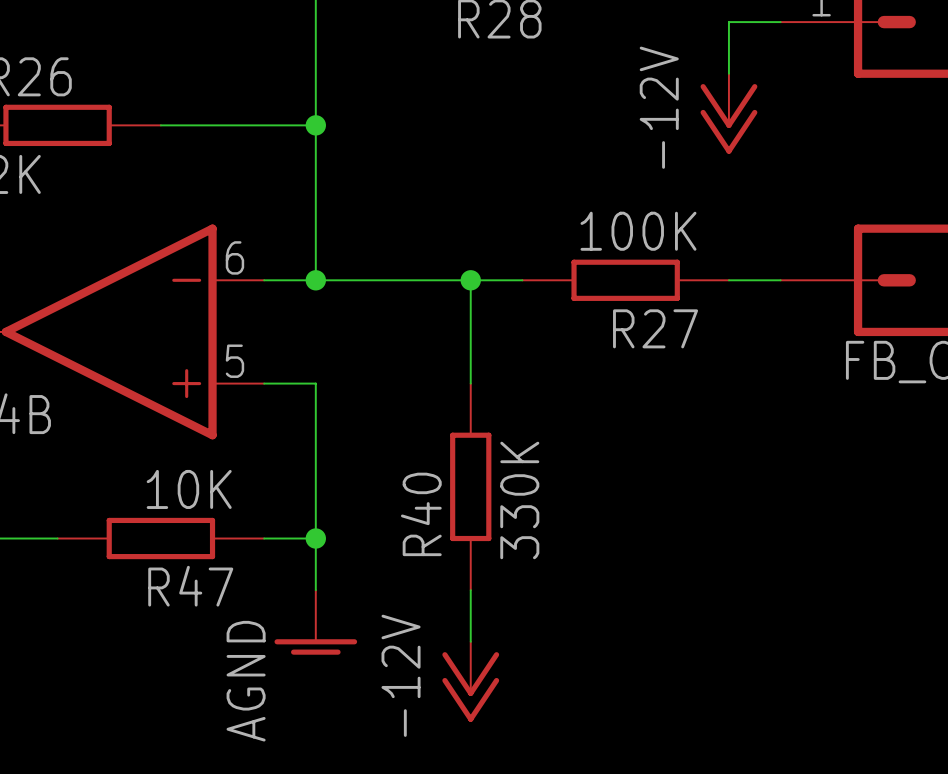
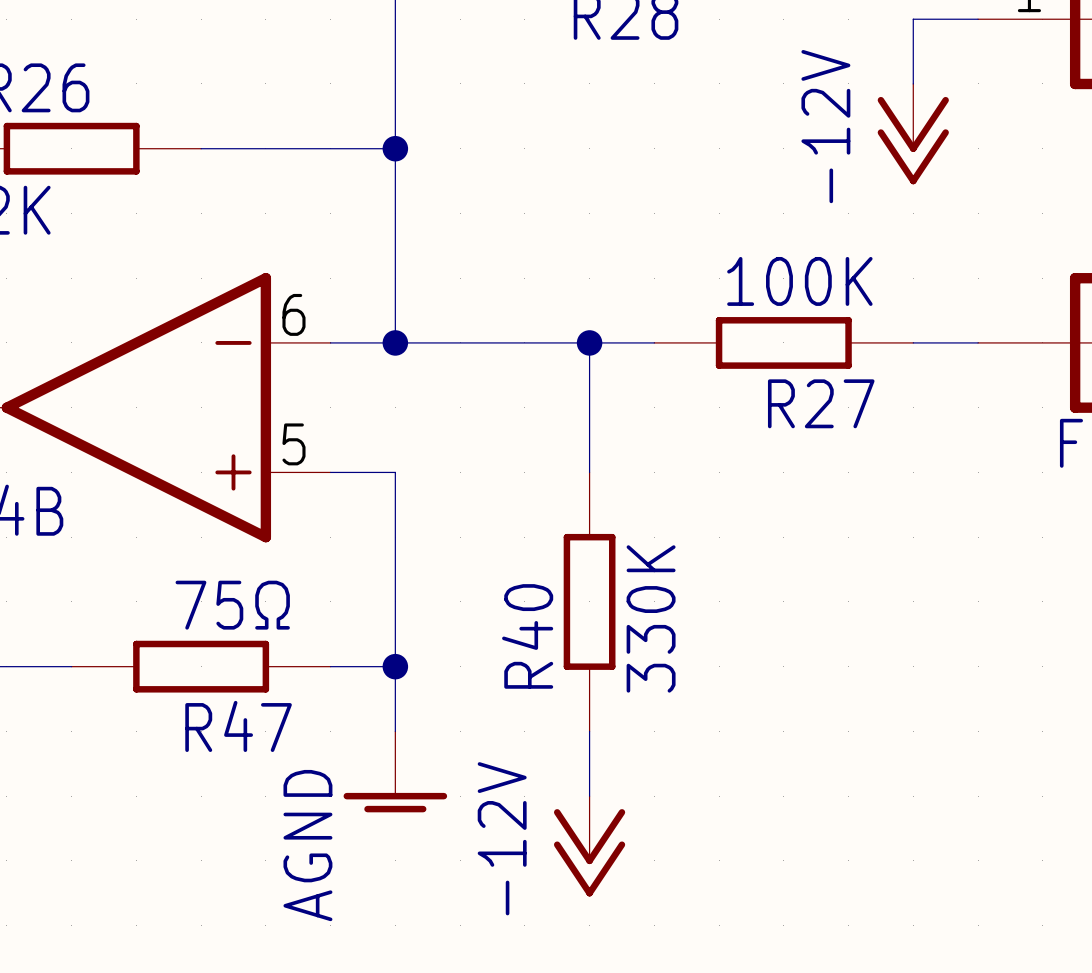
R47 value: 10K (189, 489) -> 75Ω (232, 605)

